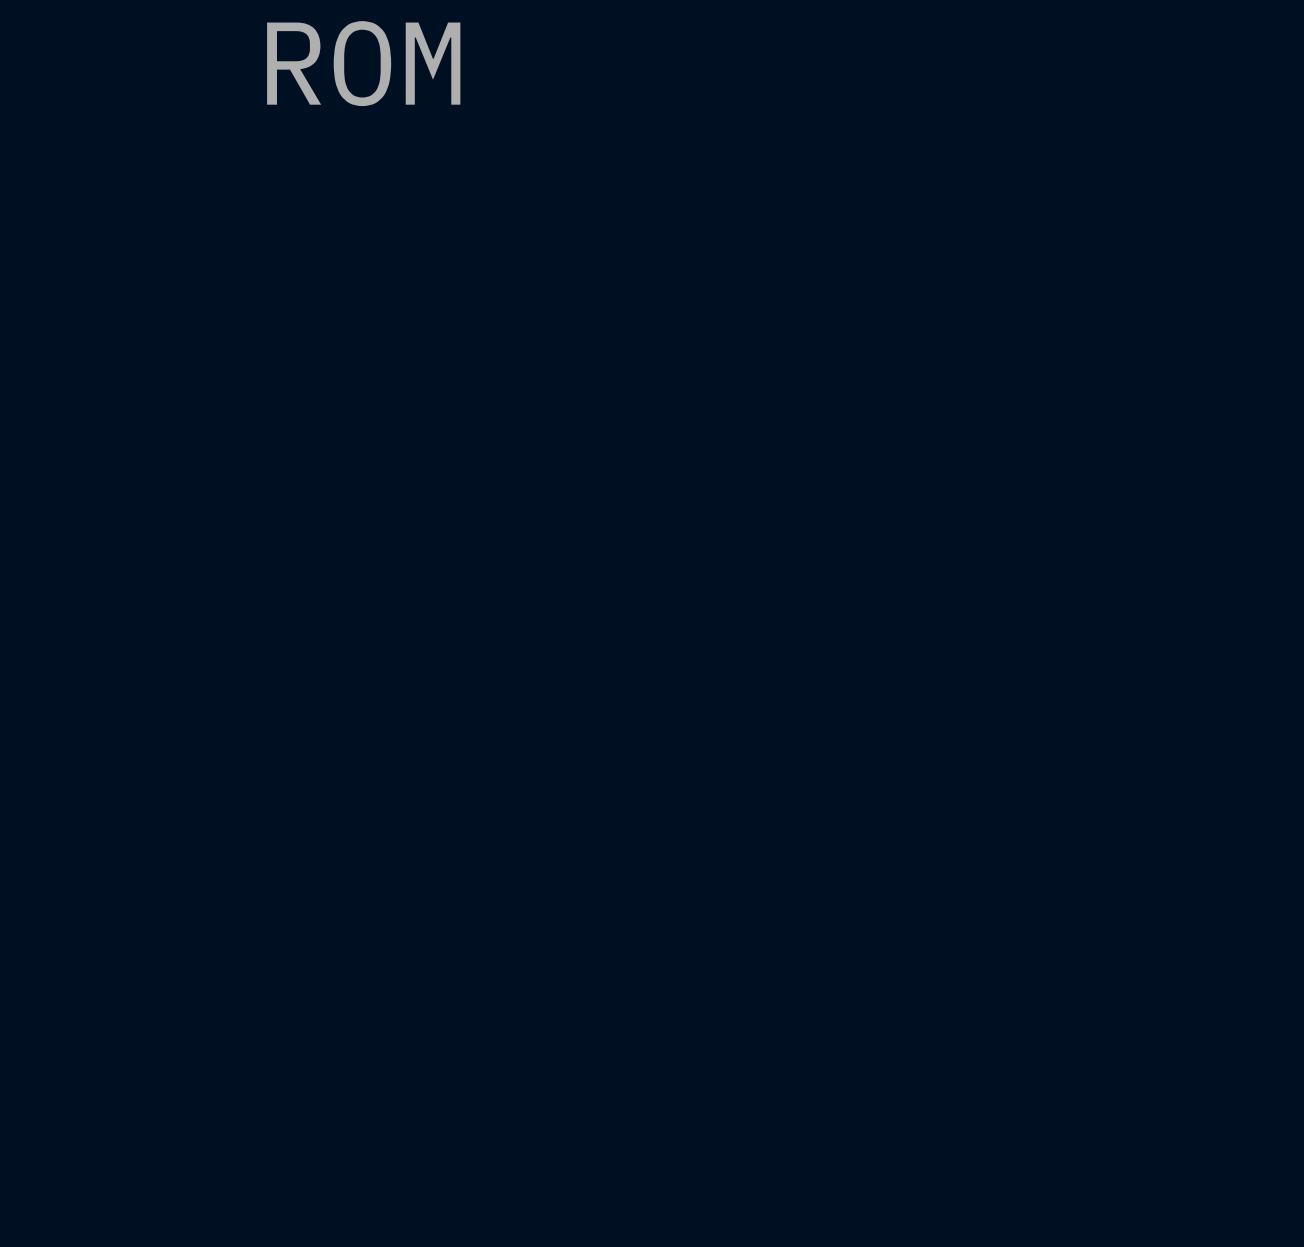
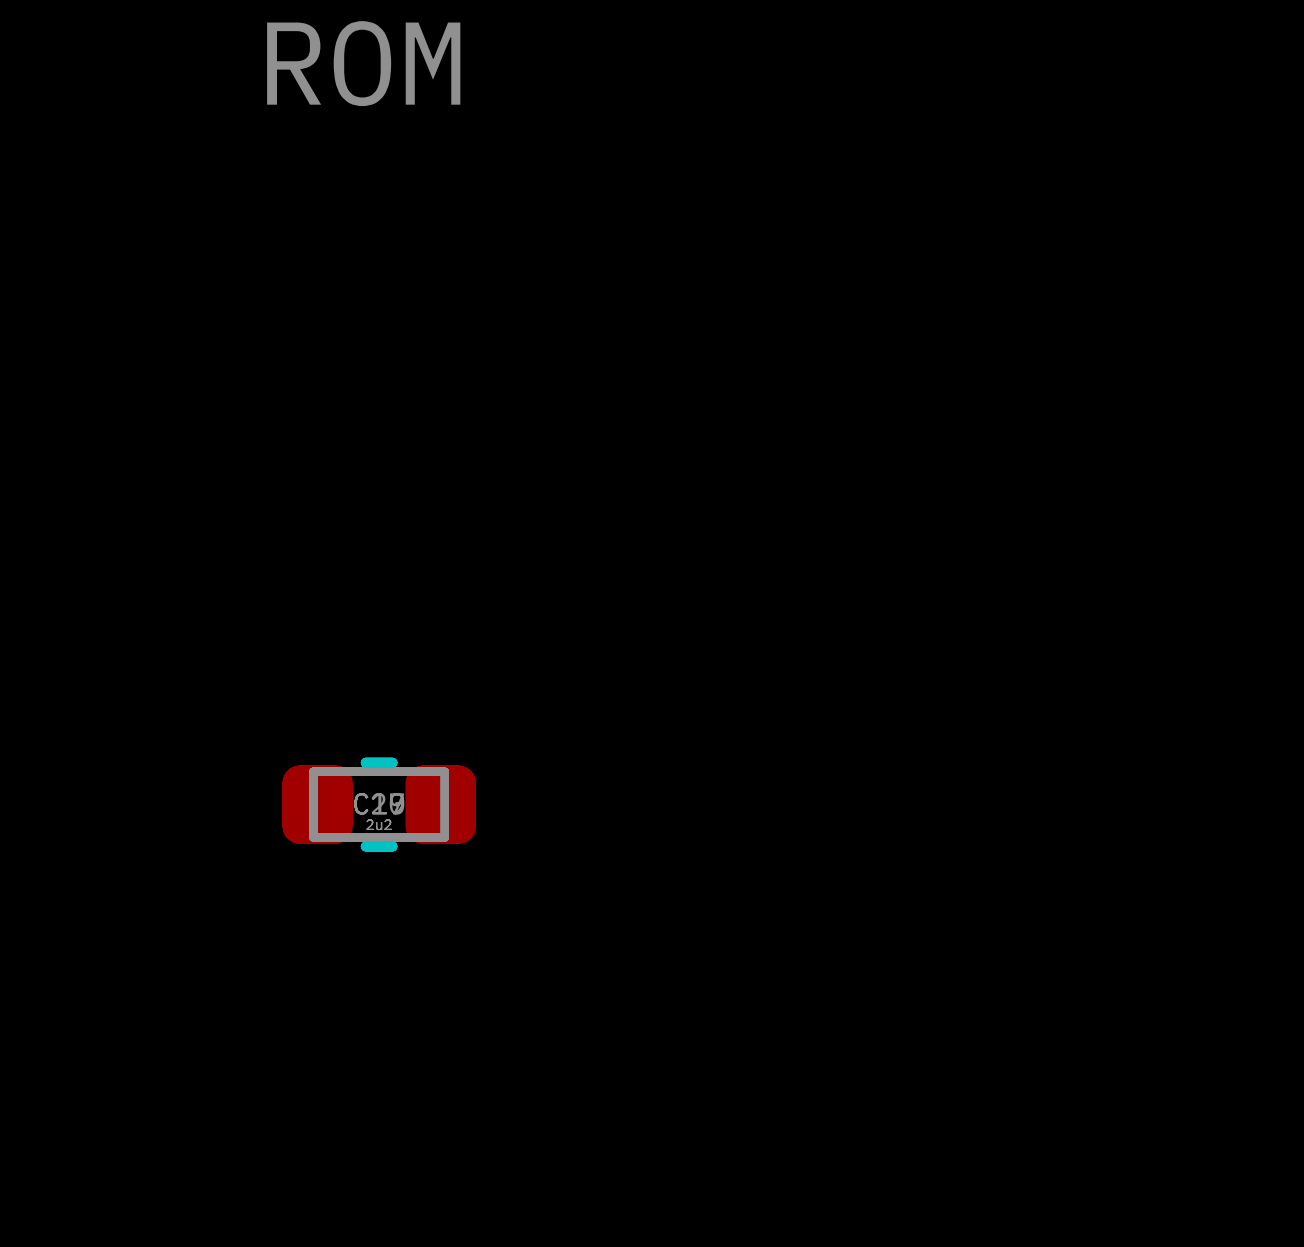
part: none -> 2u2 (379, 804)
part: none -> 2u2 (379, 804)
part: none -> 2u2 (379, 804)

